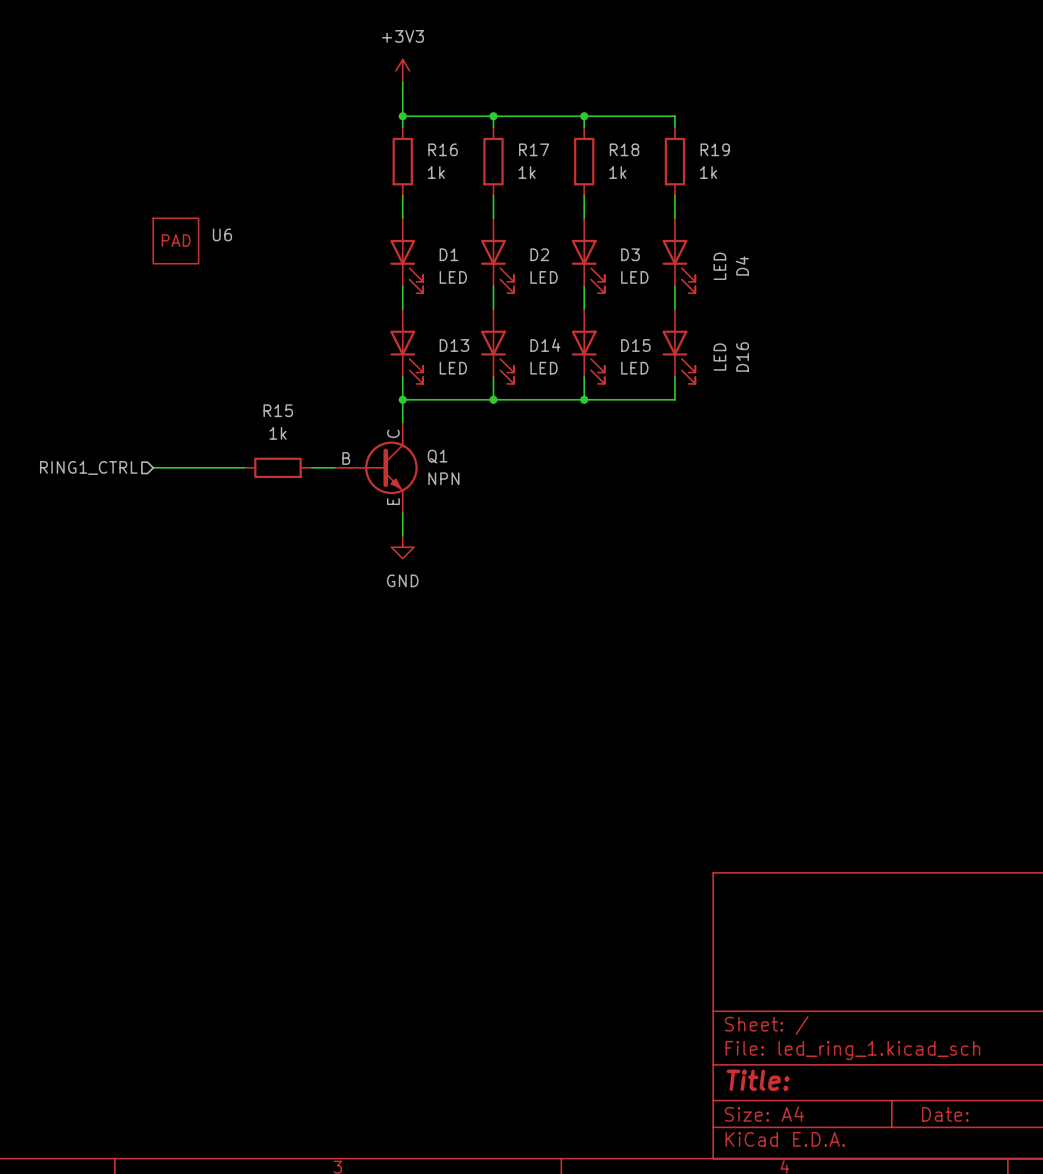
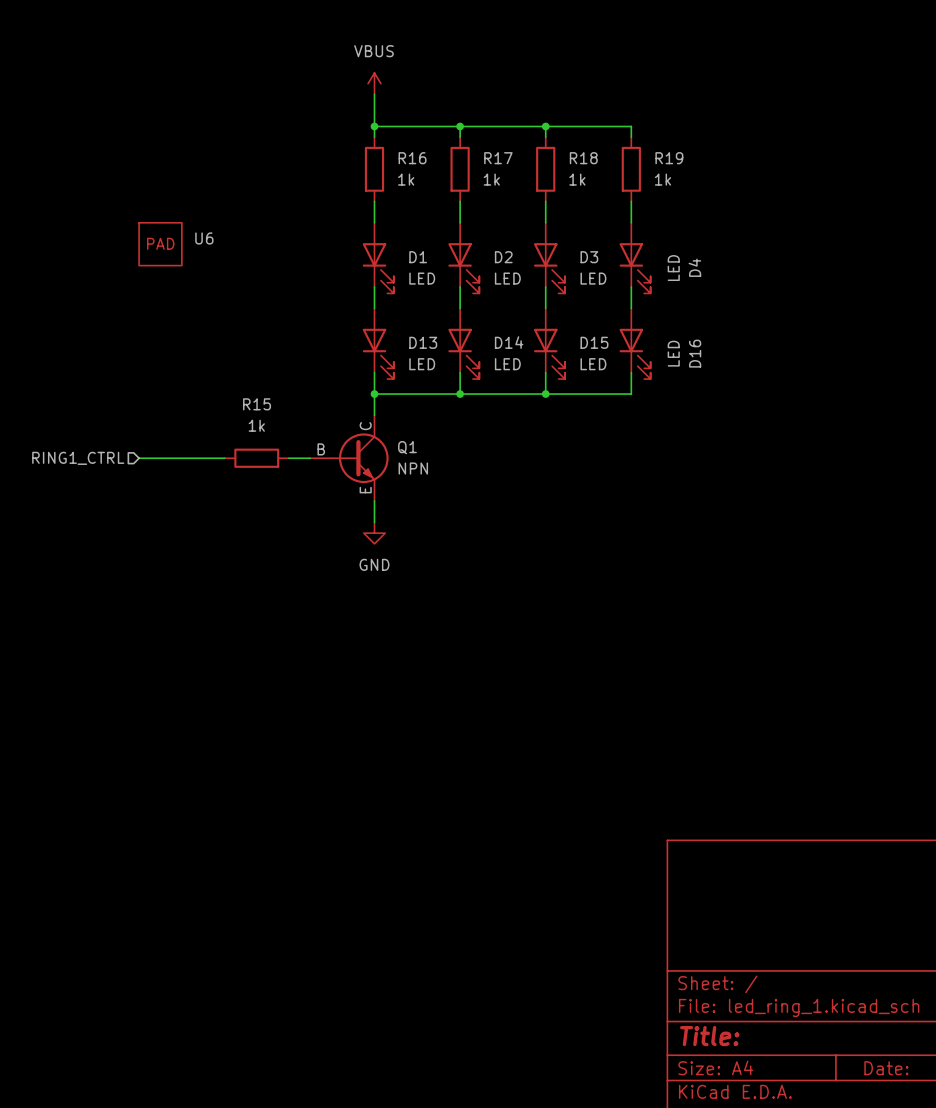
power symbol: +3V3 (402, 70) -> VBUS (374, 83)

